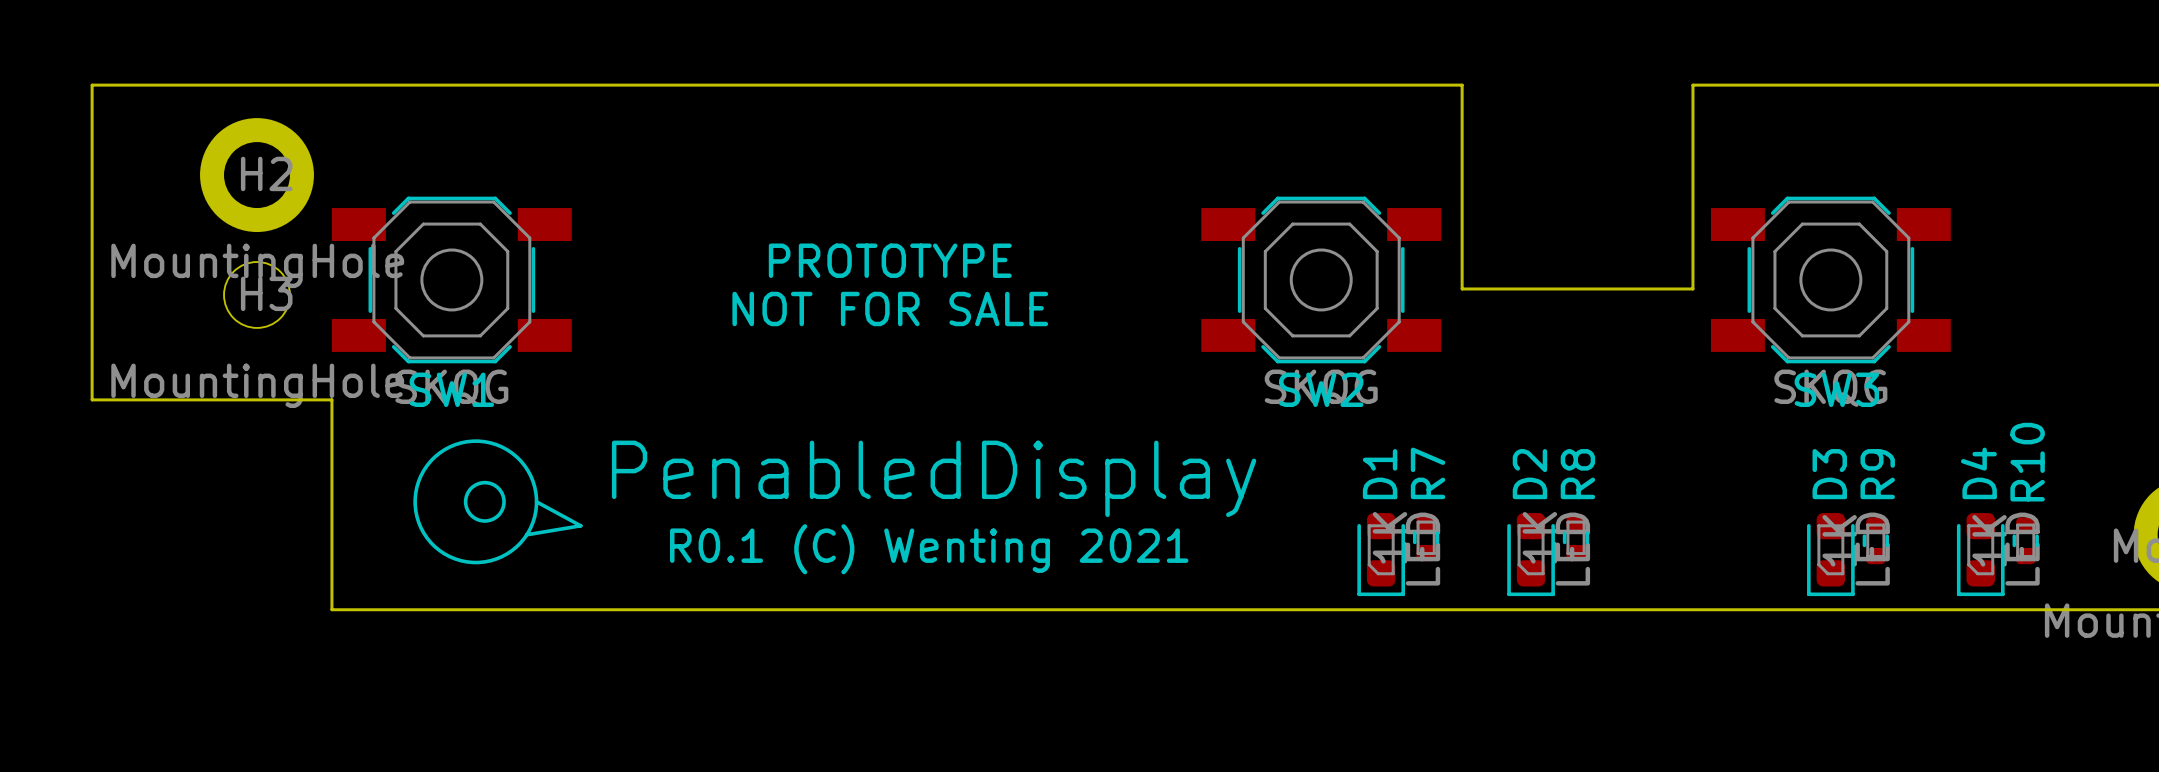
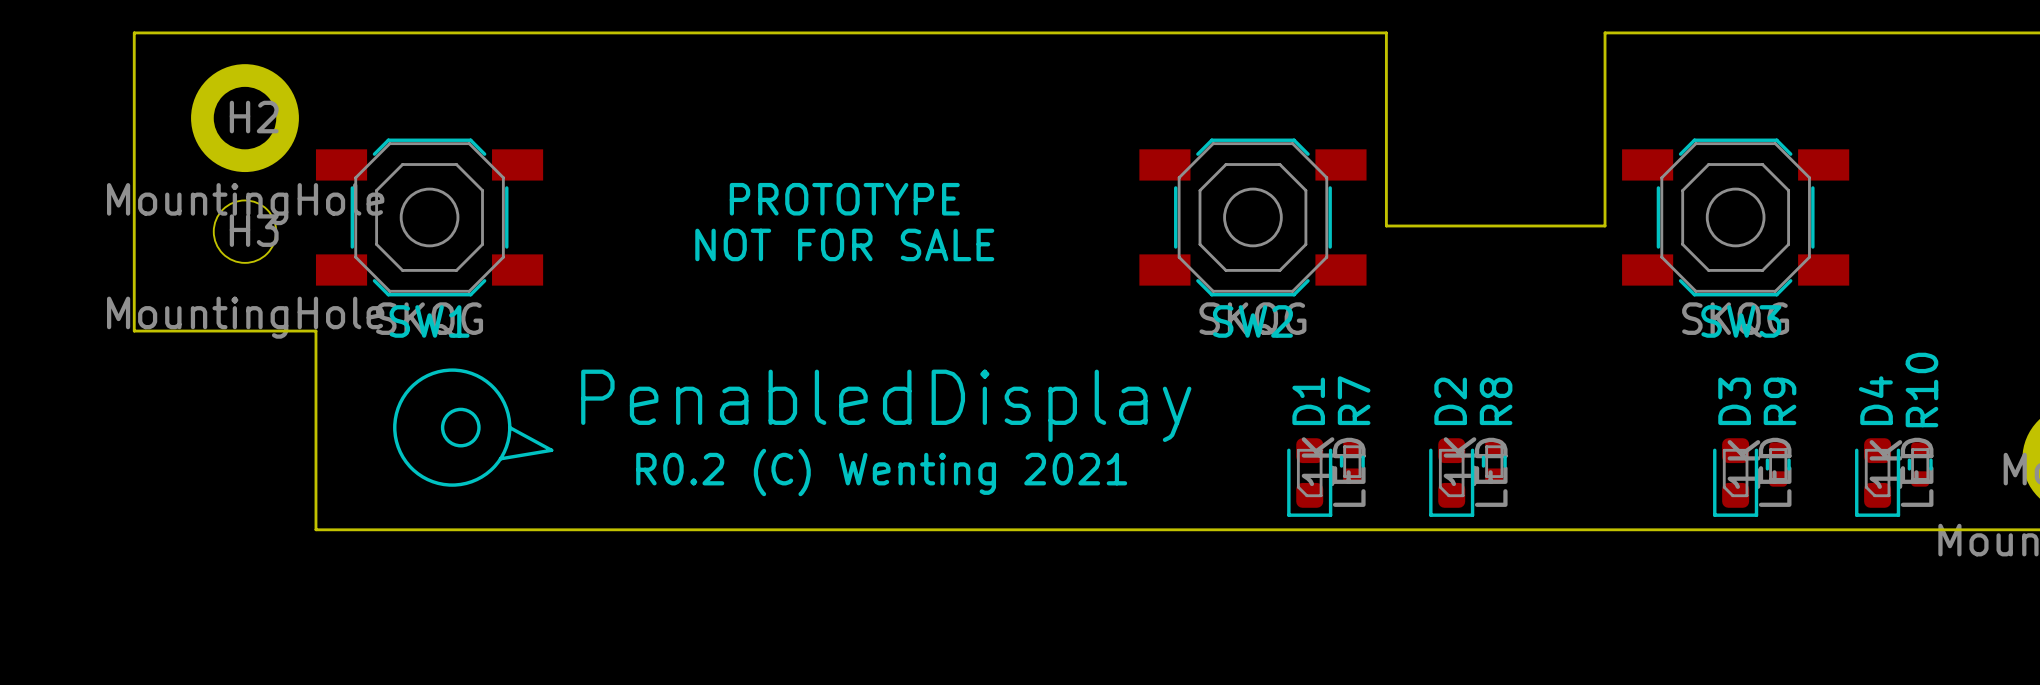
board edge: (140, 85) (92, 85) (92, 399) (140, 399) -> (134, 32) (134, 331)
text: R0.1 (C) Wenting 2021 (929, 549) -> R0.2 (C) Wenting 2021 (881, 472)

